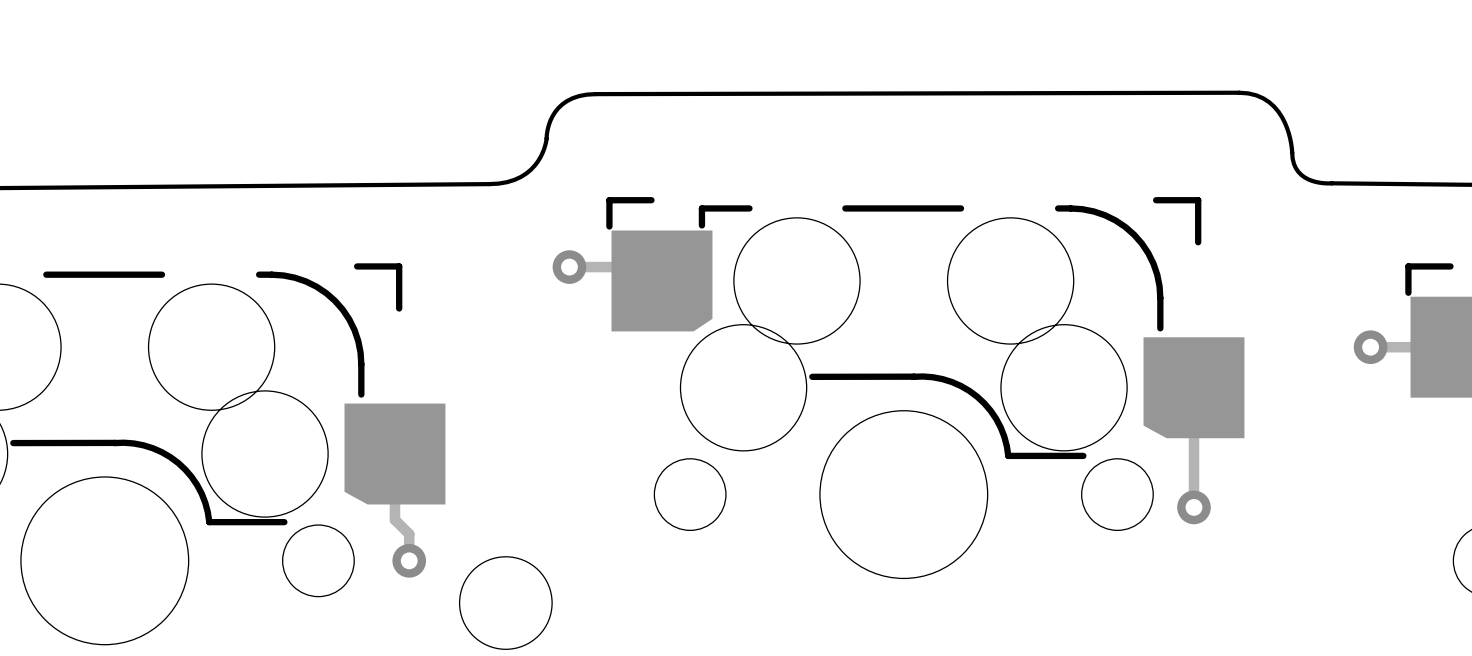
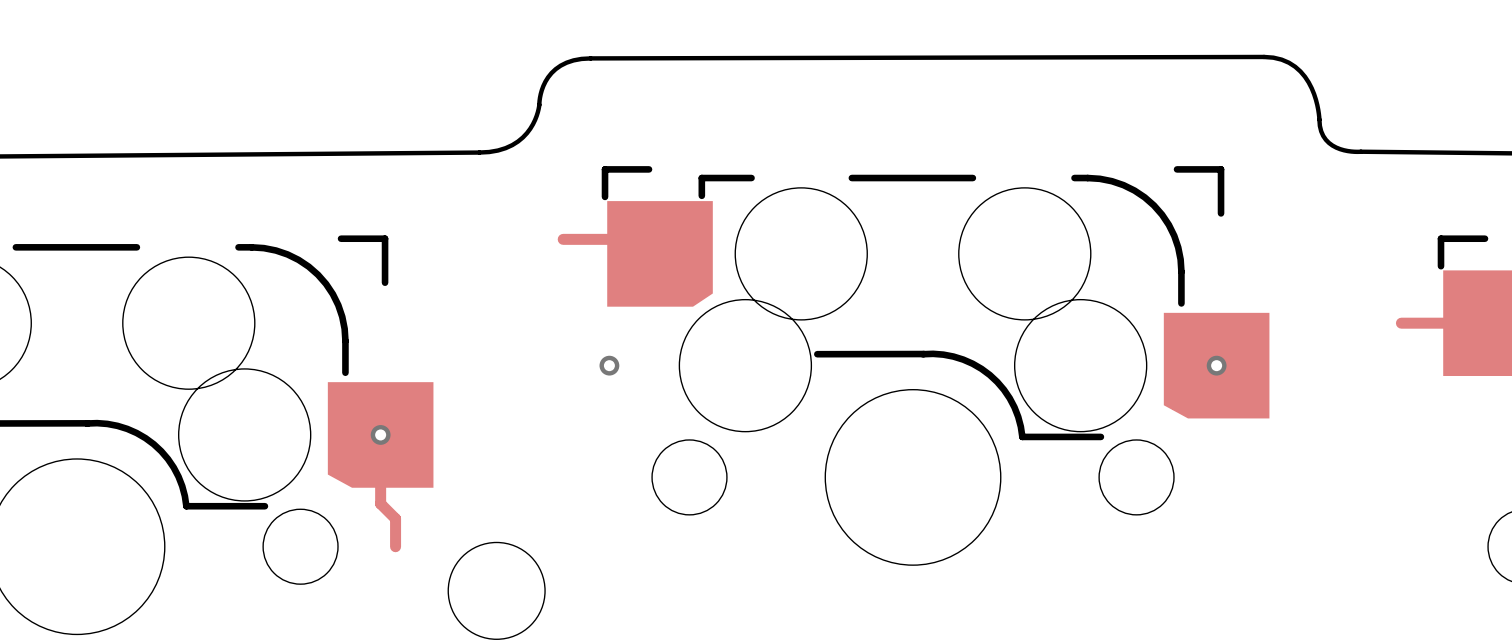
via: (569, 267) -> none
via: (1370, 347) -> none
via: none -> (609, 365)
track: (1193, 387) (1193, 507) -> none
via: none -> (1216, 365)
via: none -> (380, 434)
via: (1193, 507) -> none
via: (409, 560) -> none

